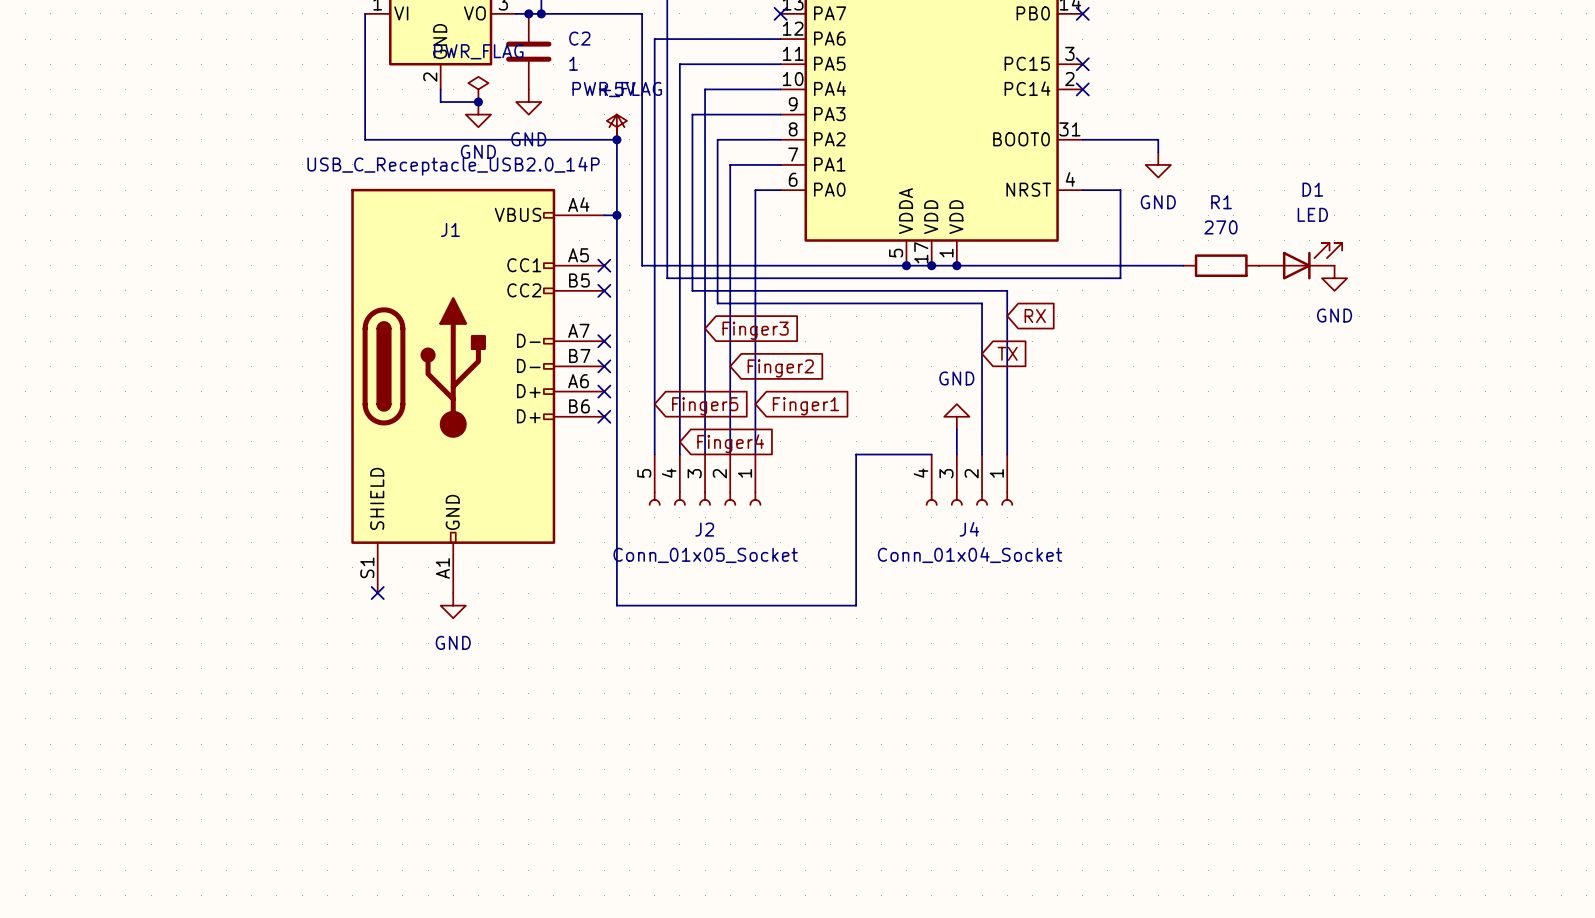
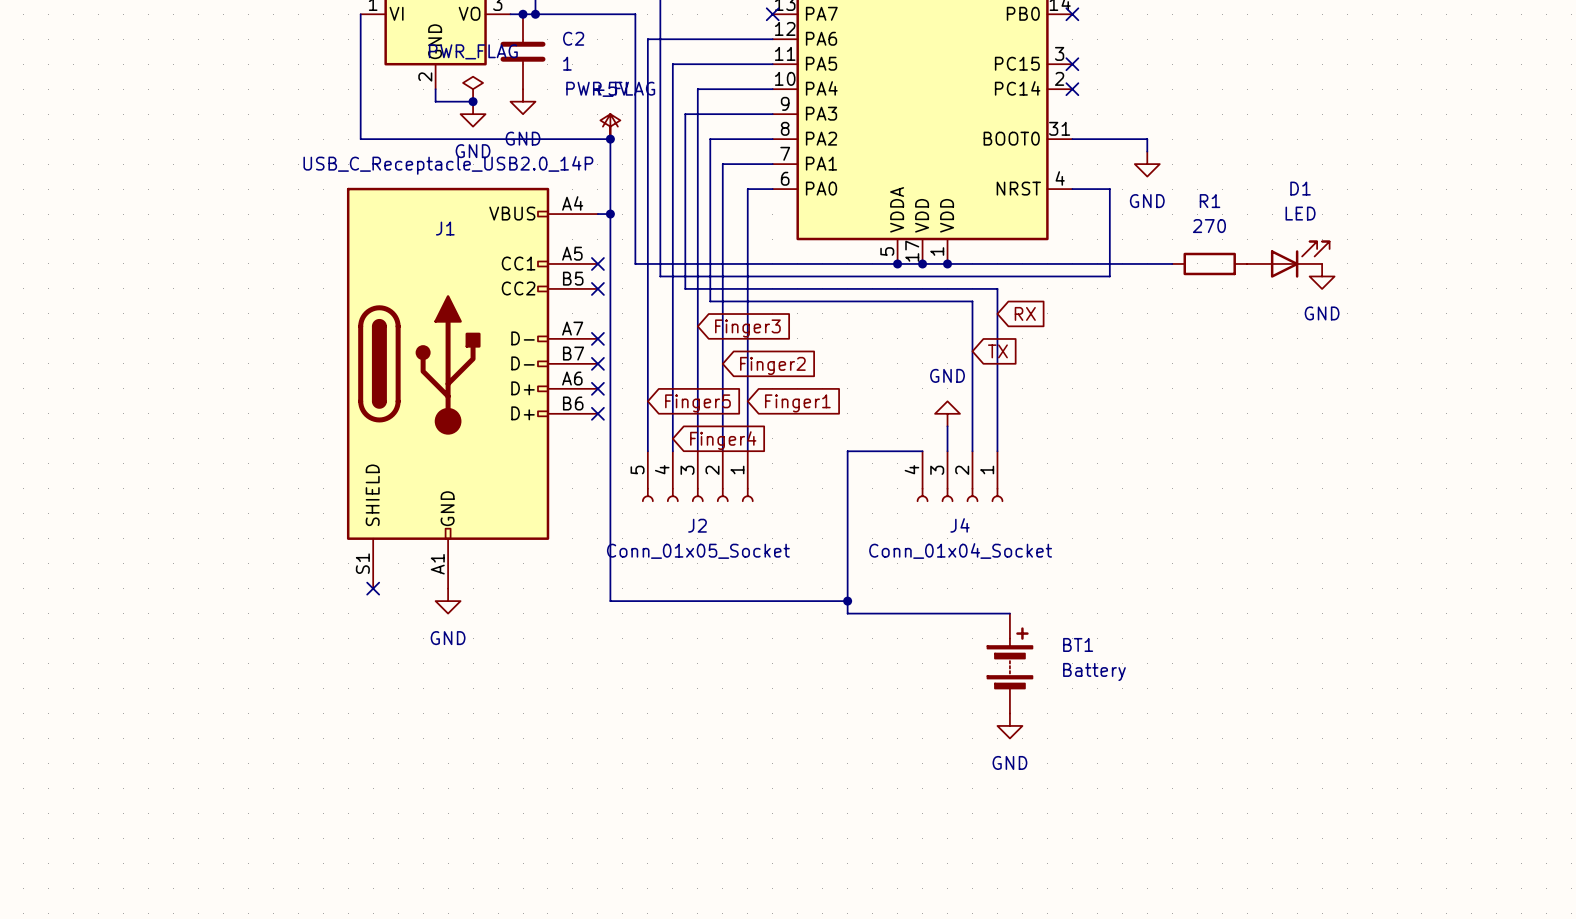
wire: none -> (847, 601) (847, 613) (1009, 613)
junction: none -> (847, 601)
BT1: none -> Battery (1009, 663)
power symbol: none -> GND (1009, 725)

